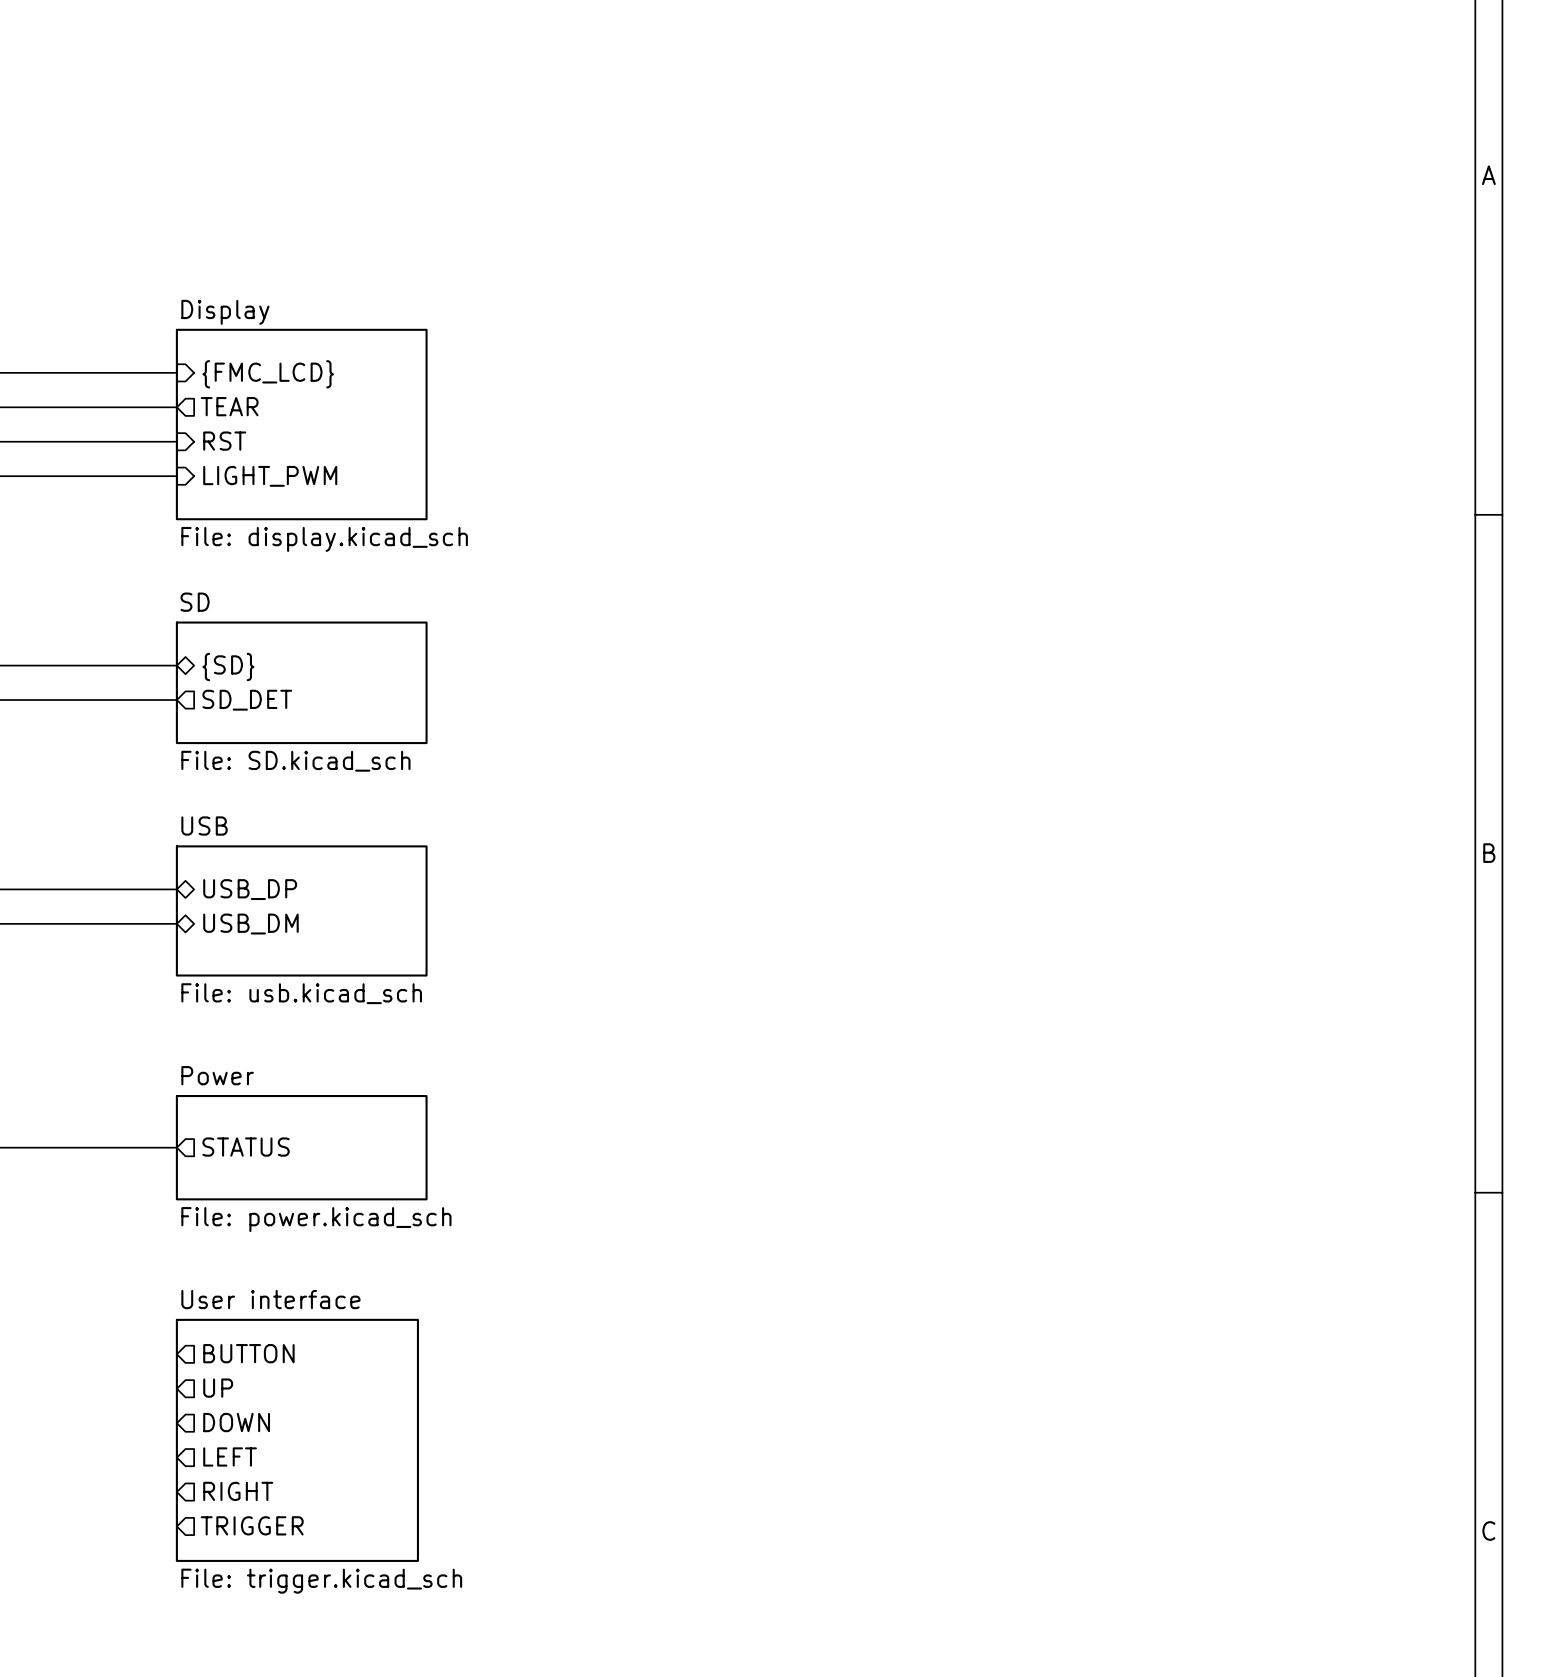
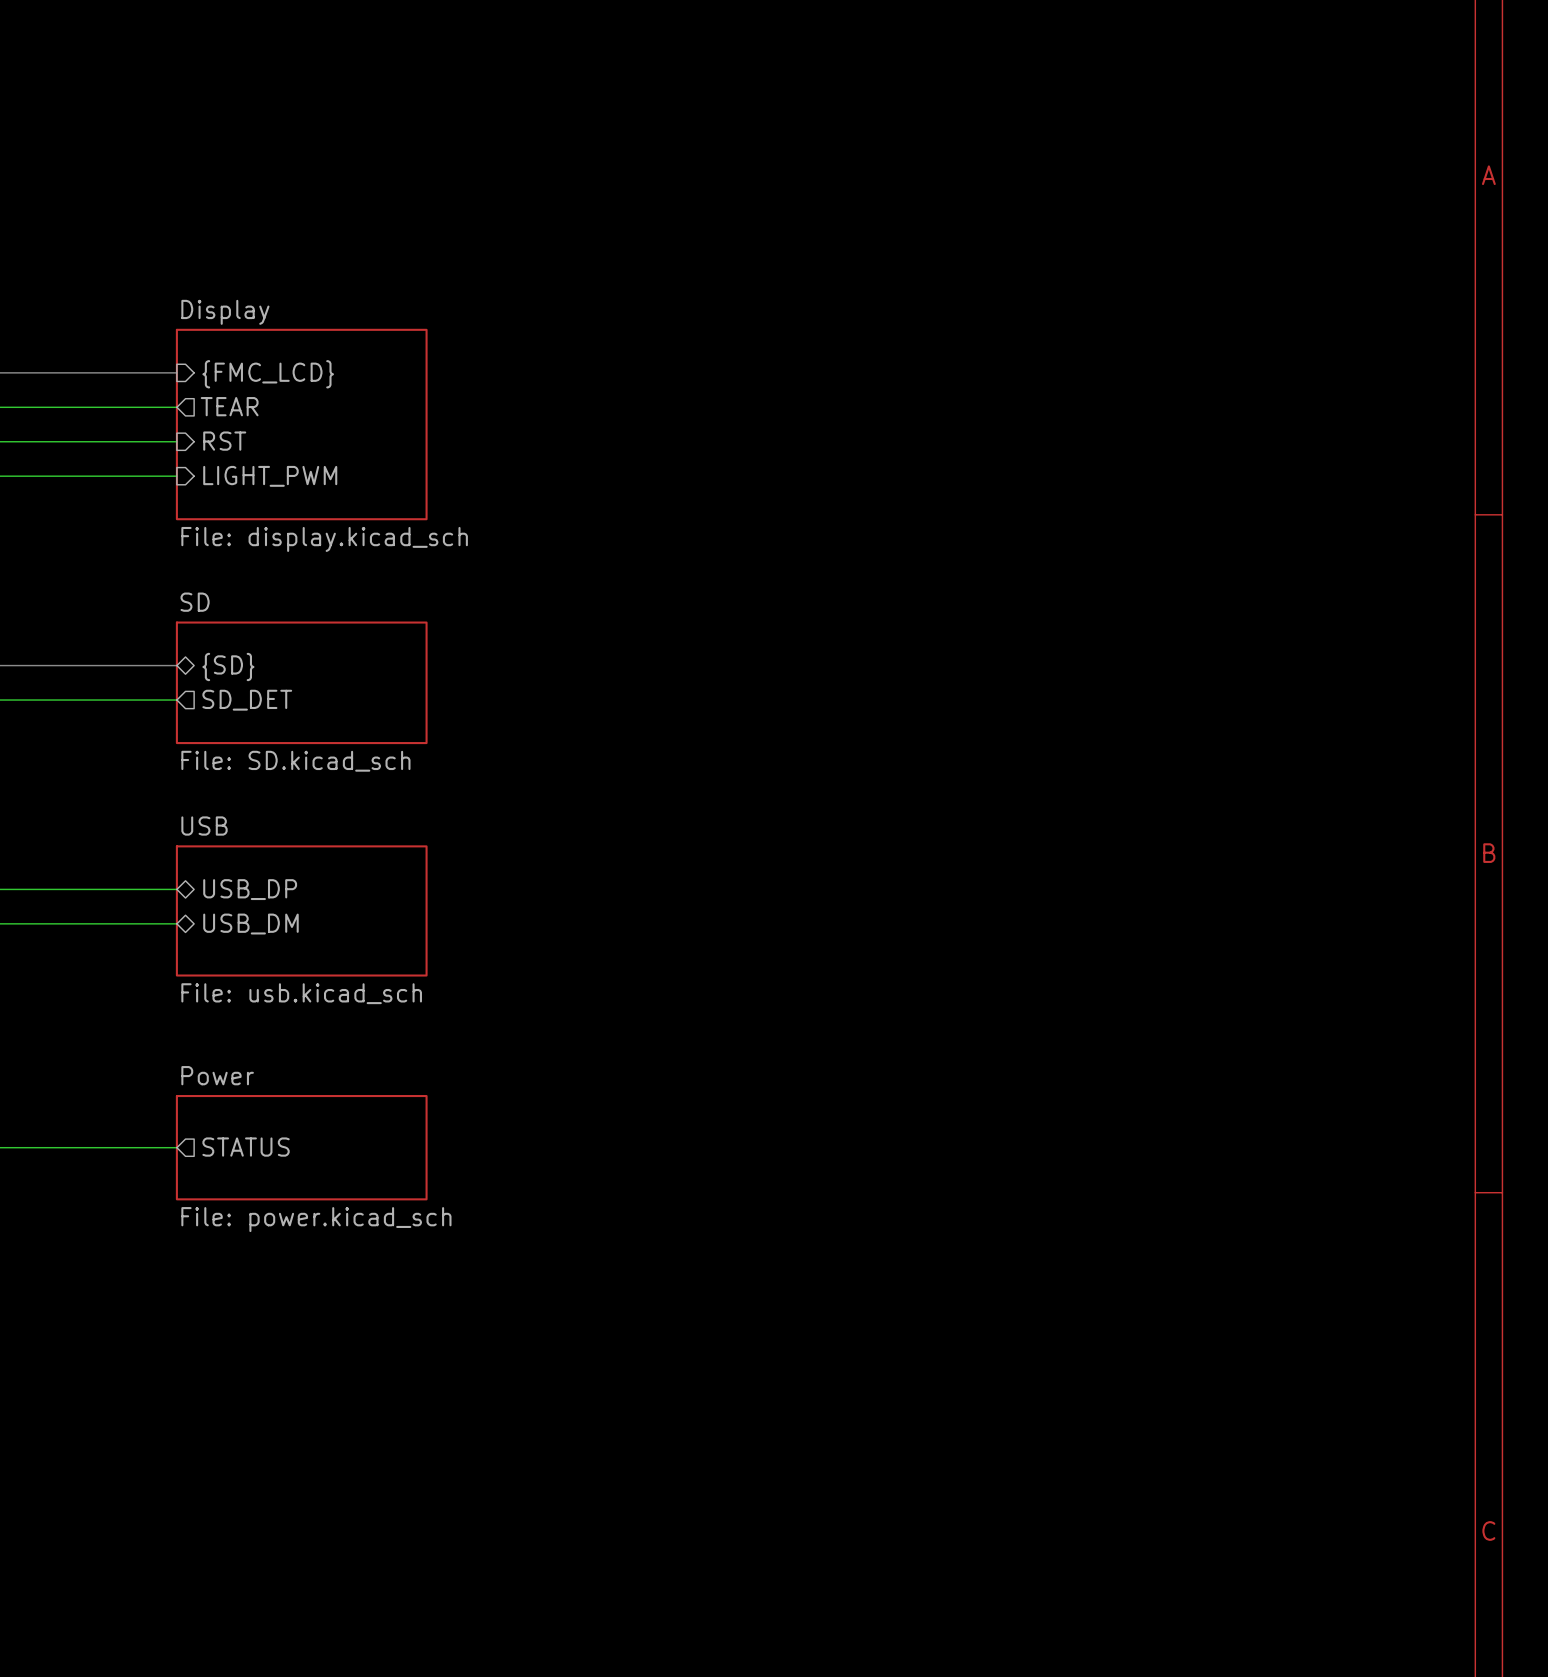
sheet pin: BUTTON (248, 1353) -> none
sheet pin: UP (218, 1388) -> none
sheet pin: DOWN (236, 1422) -> none
sheet User interface: File: trigger.kicad_sch (297, 1440) -> none
sheet pin: LEFT (230, 1456) -> none
sheet pin: RIGHT (238, 1491) -> none
sheet pin: TRIGGER (252, 1525) -> none

